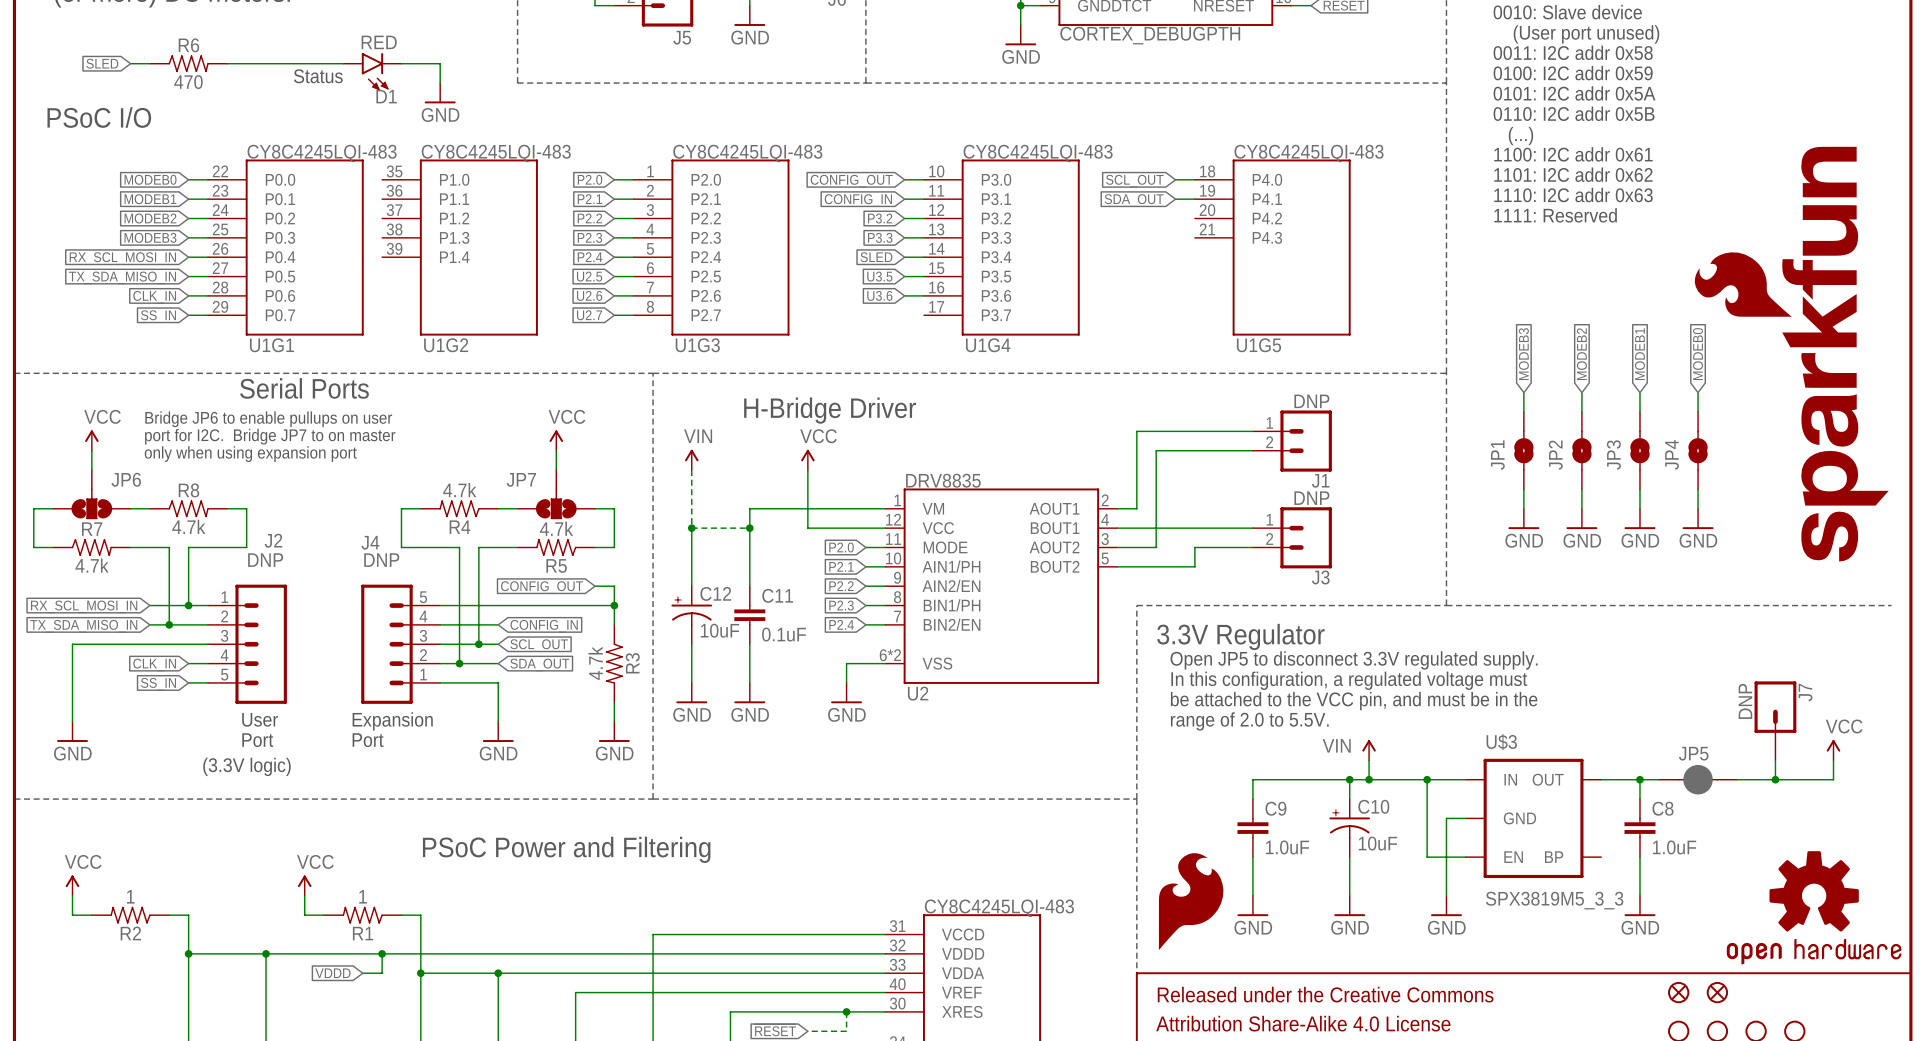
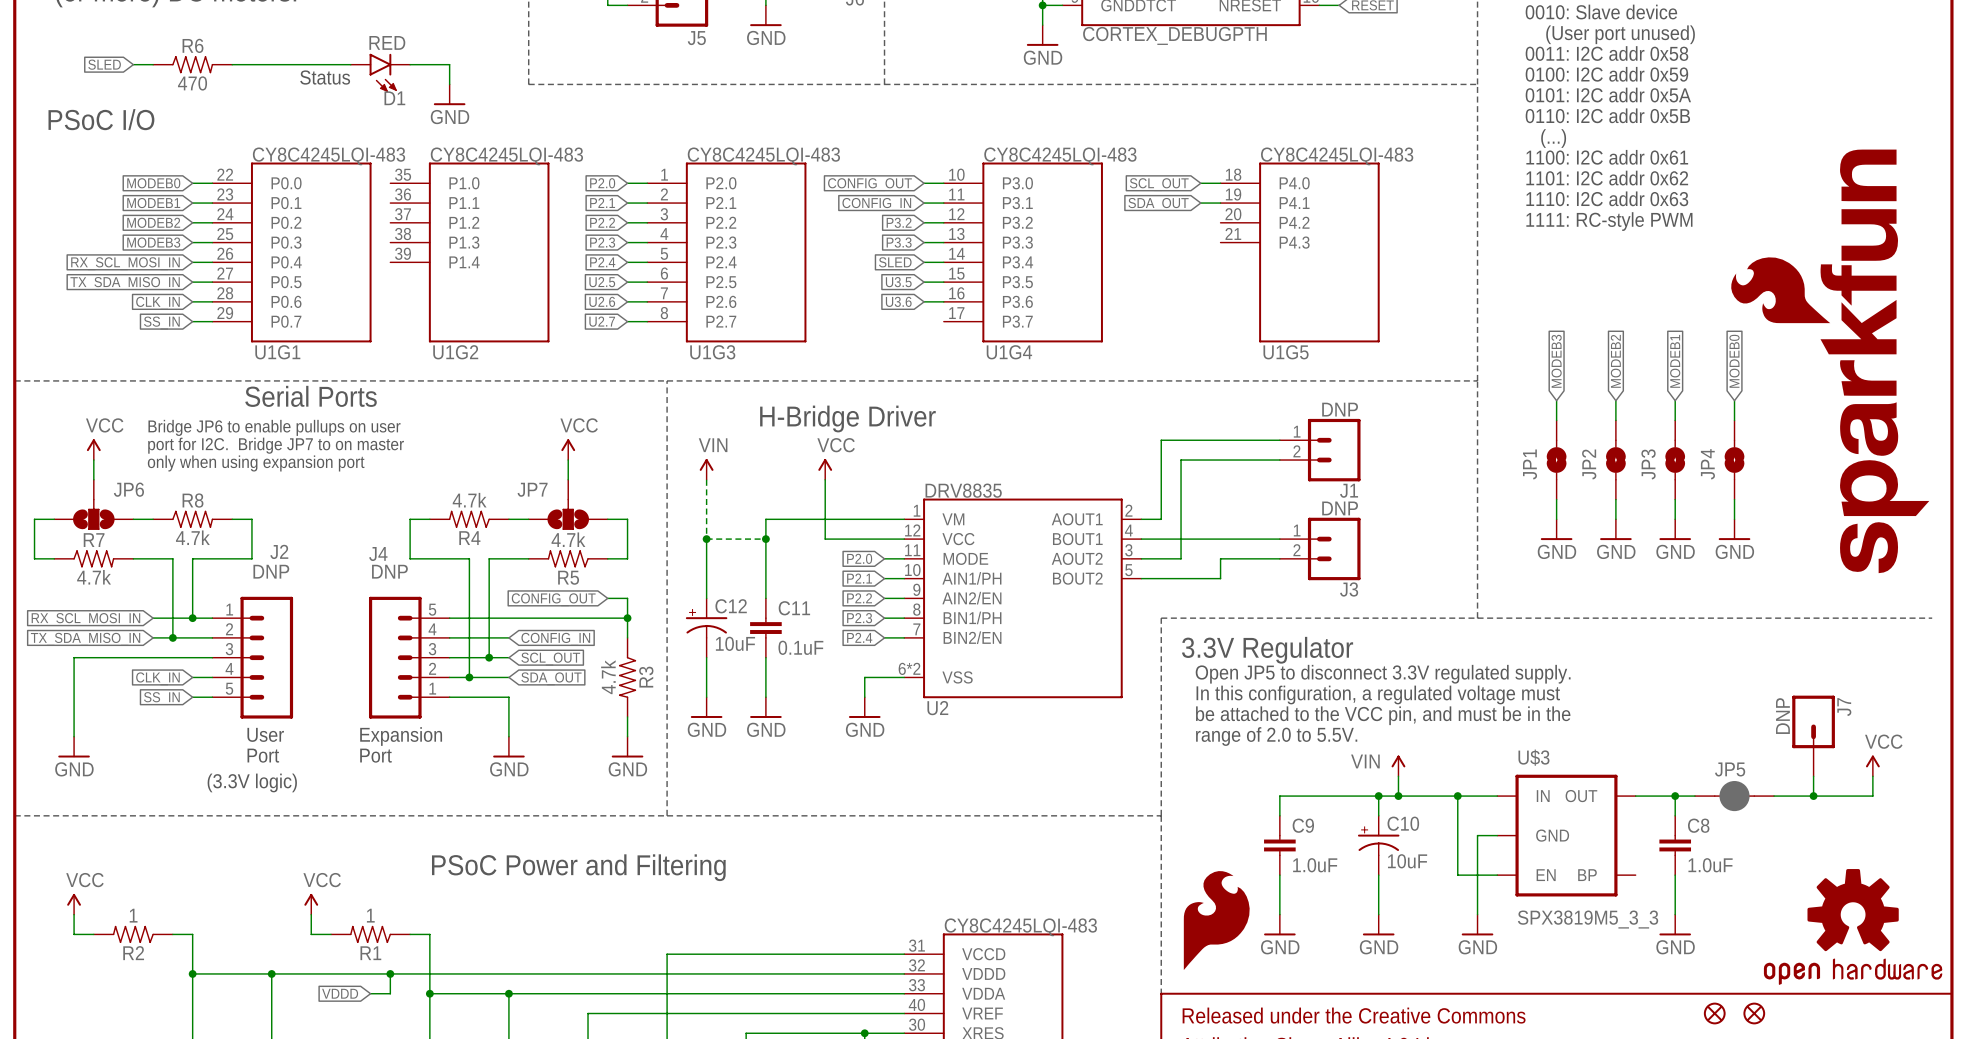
text: 1111: Reserved (1555, 215) -> 1111: RC-style PWM (1609, 221)

